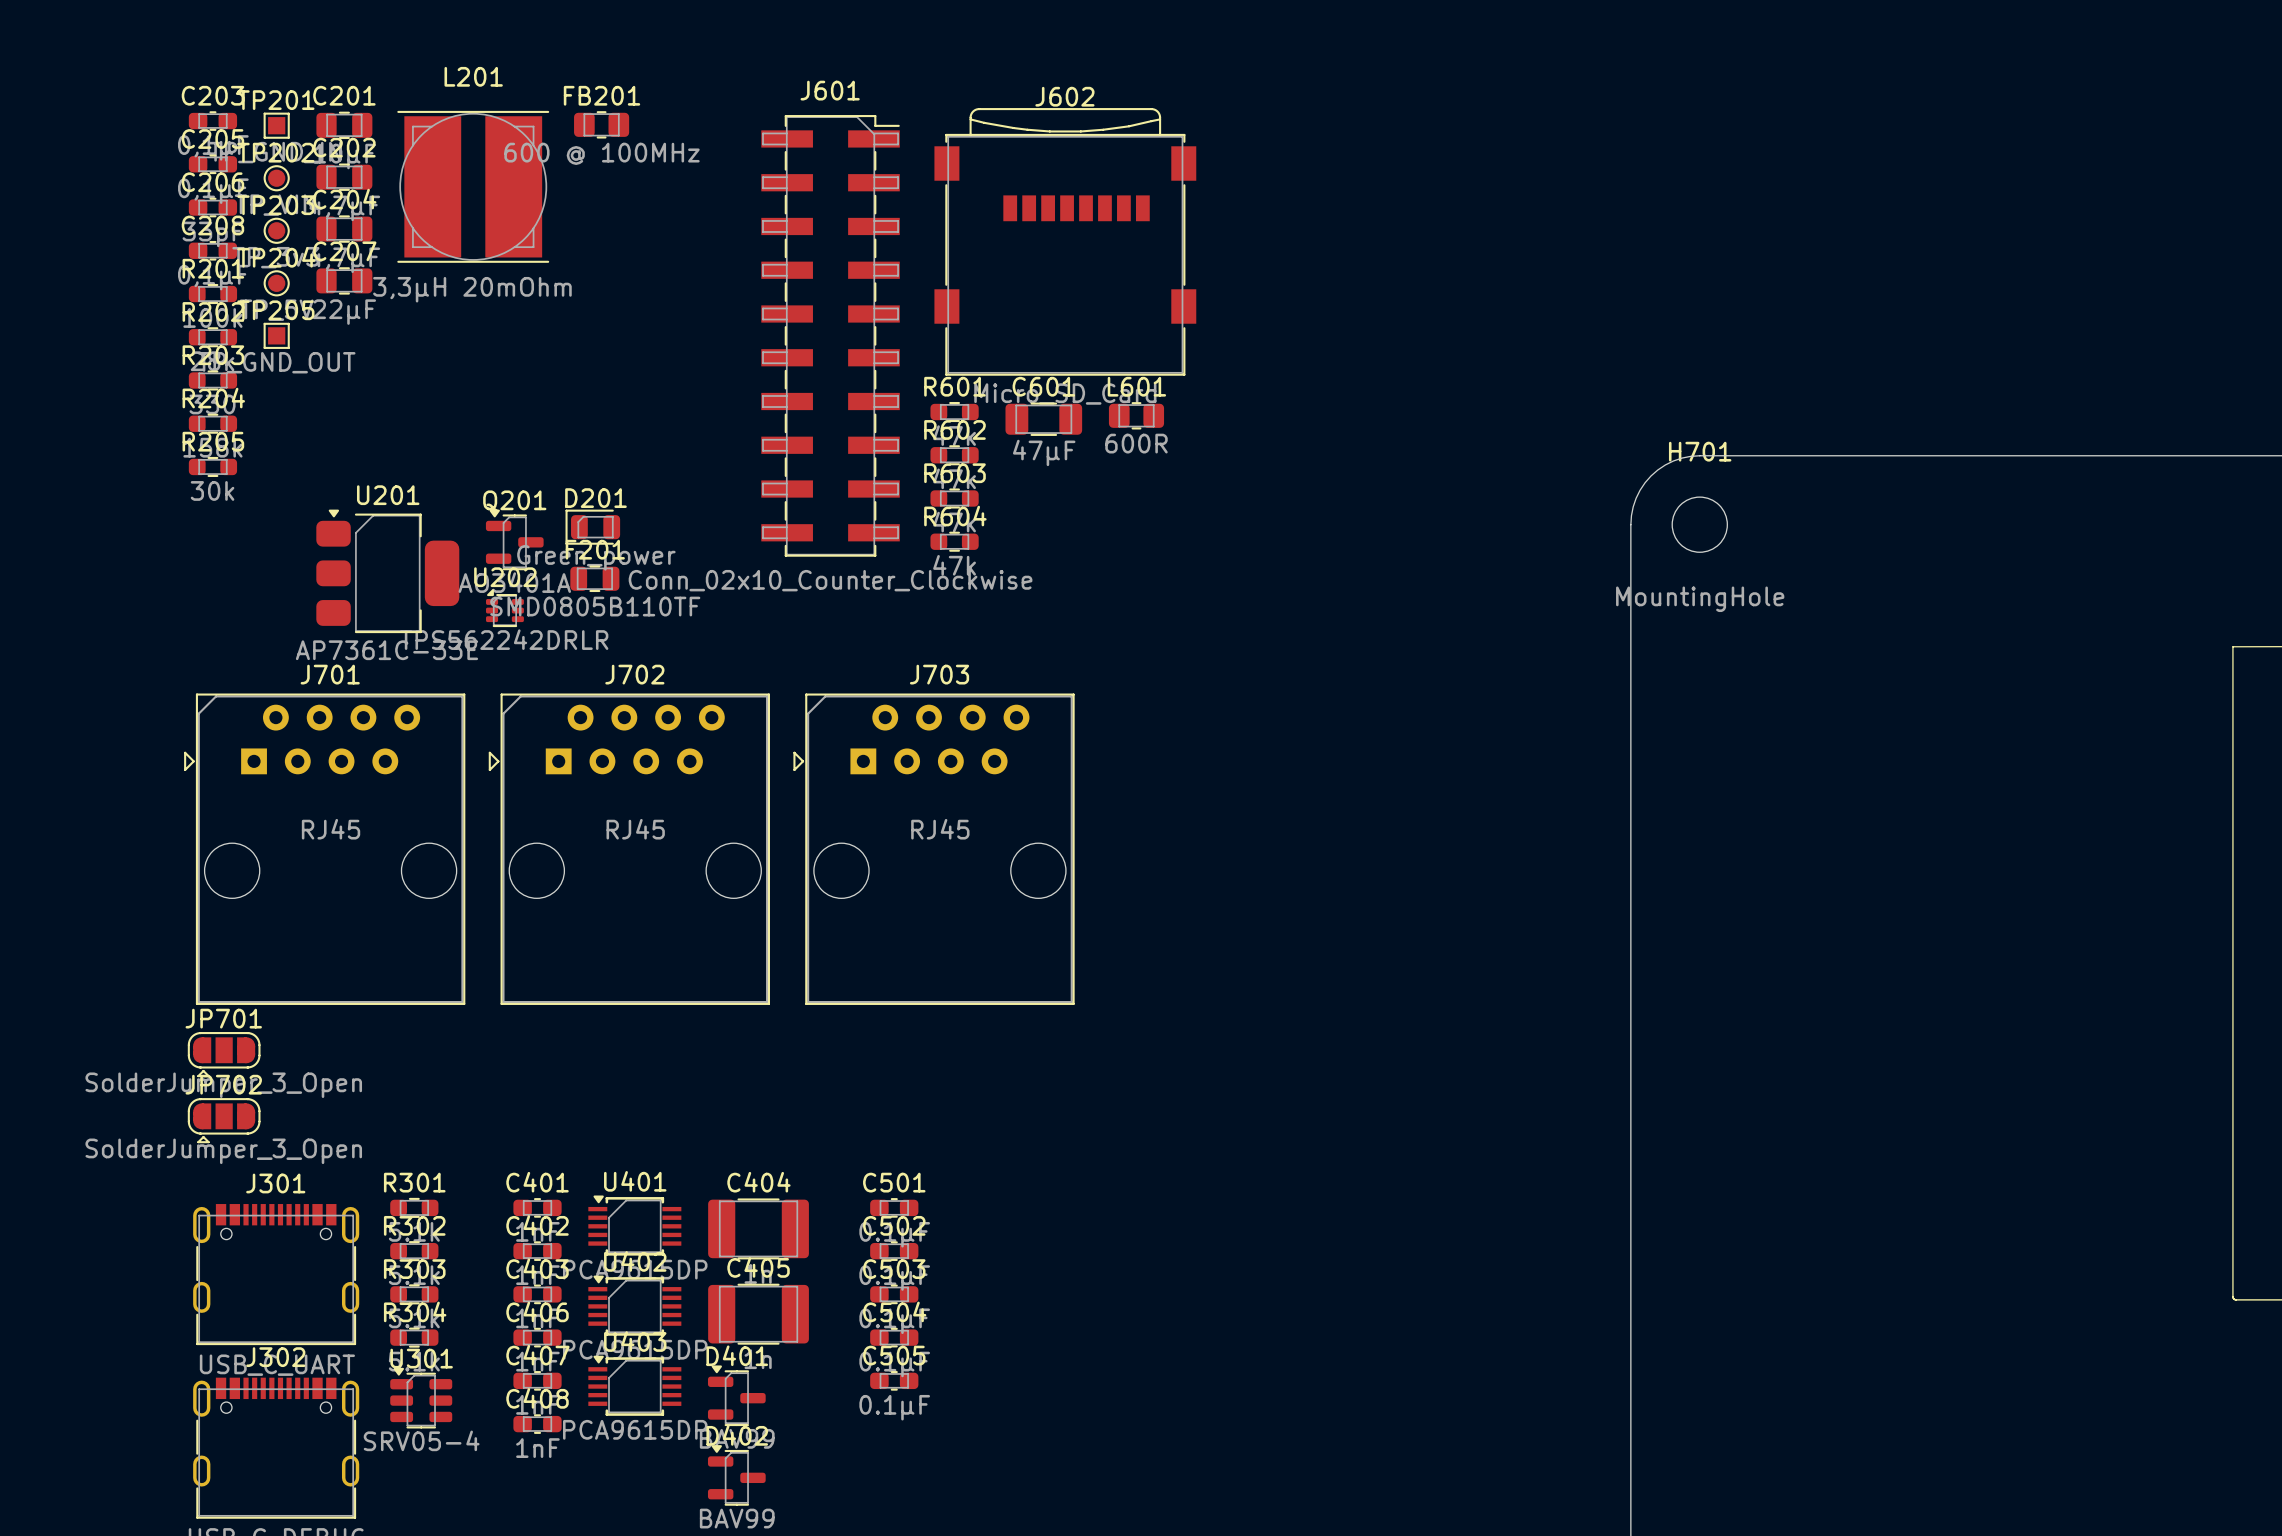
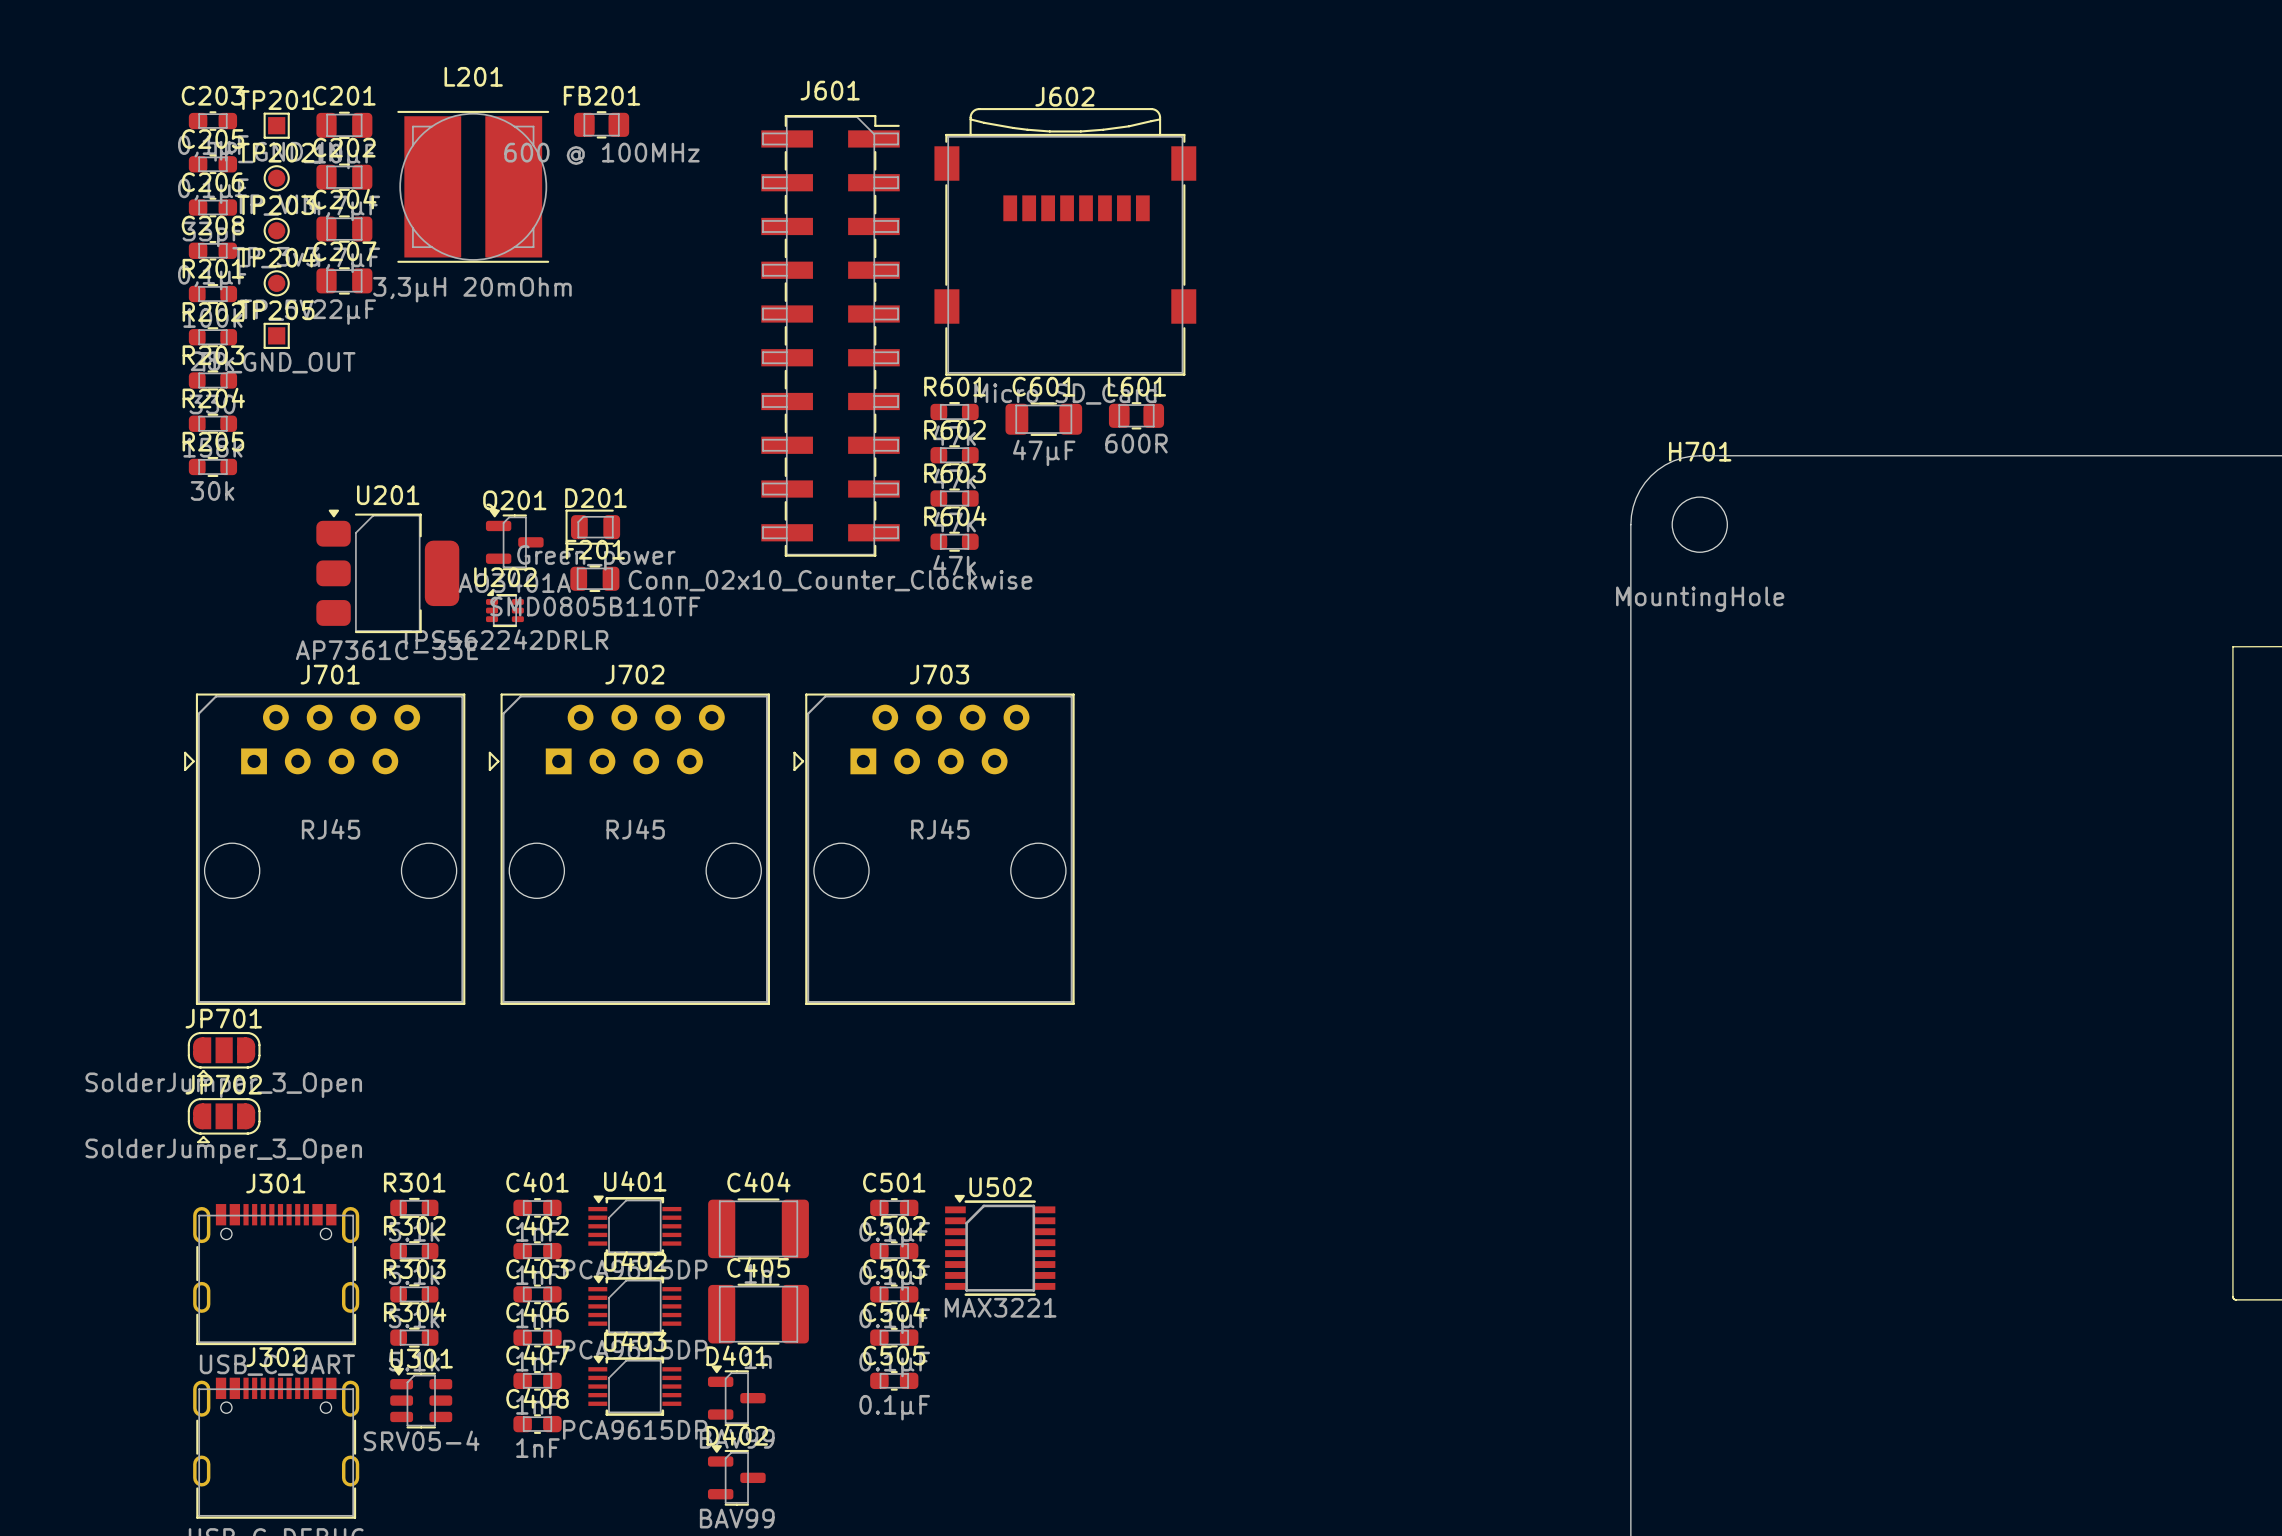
U502: none -> MAX3221 (1000, 1245)

